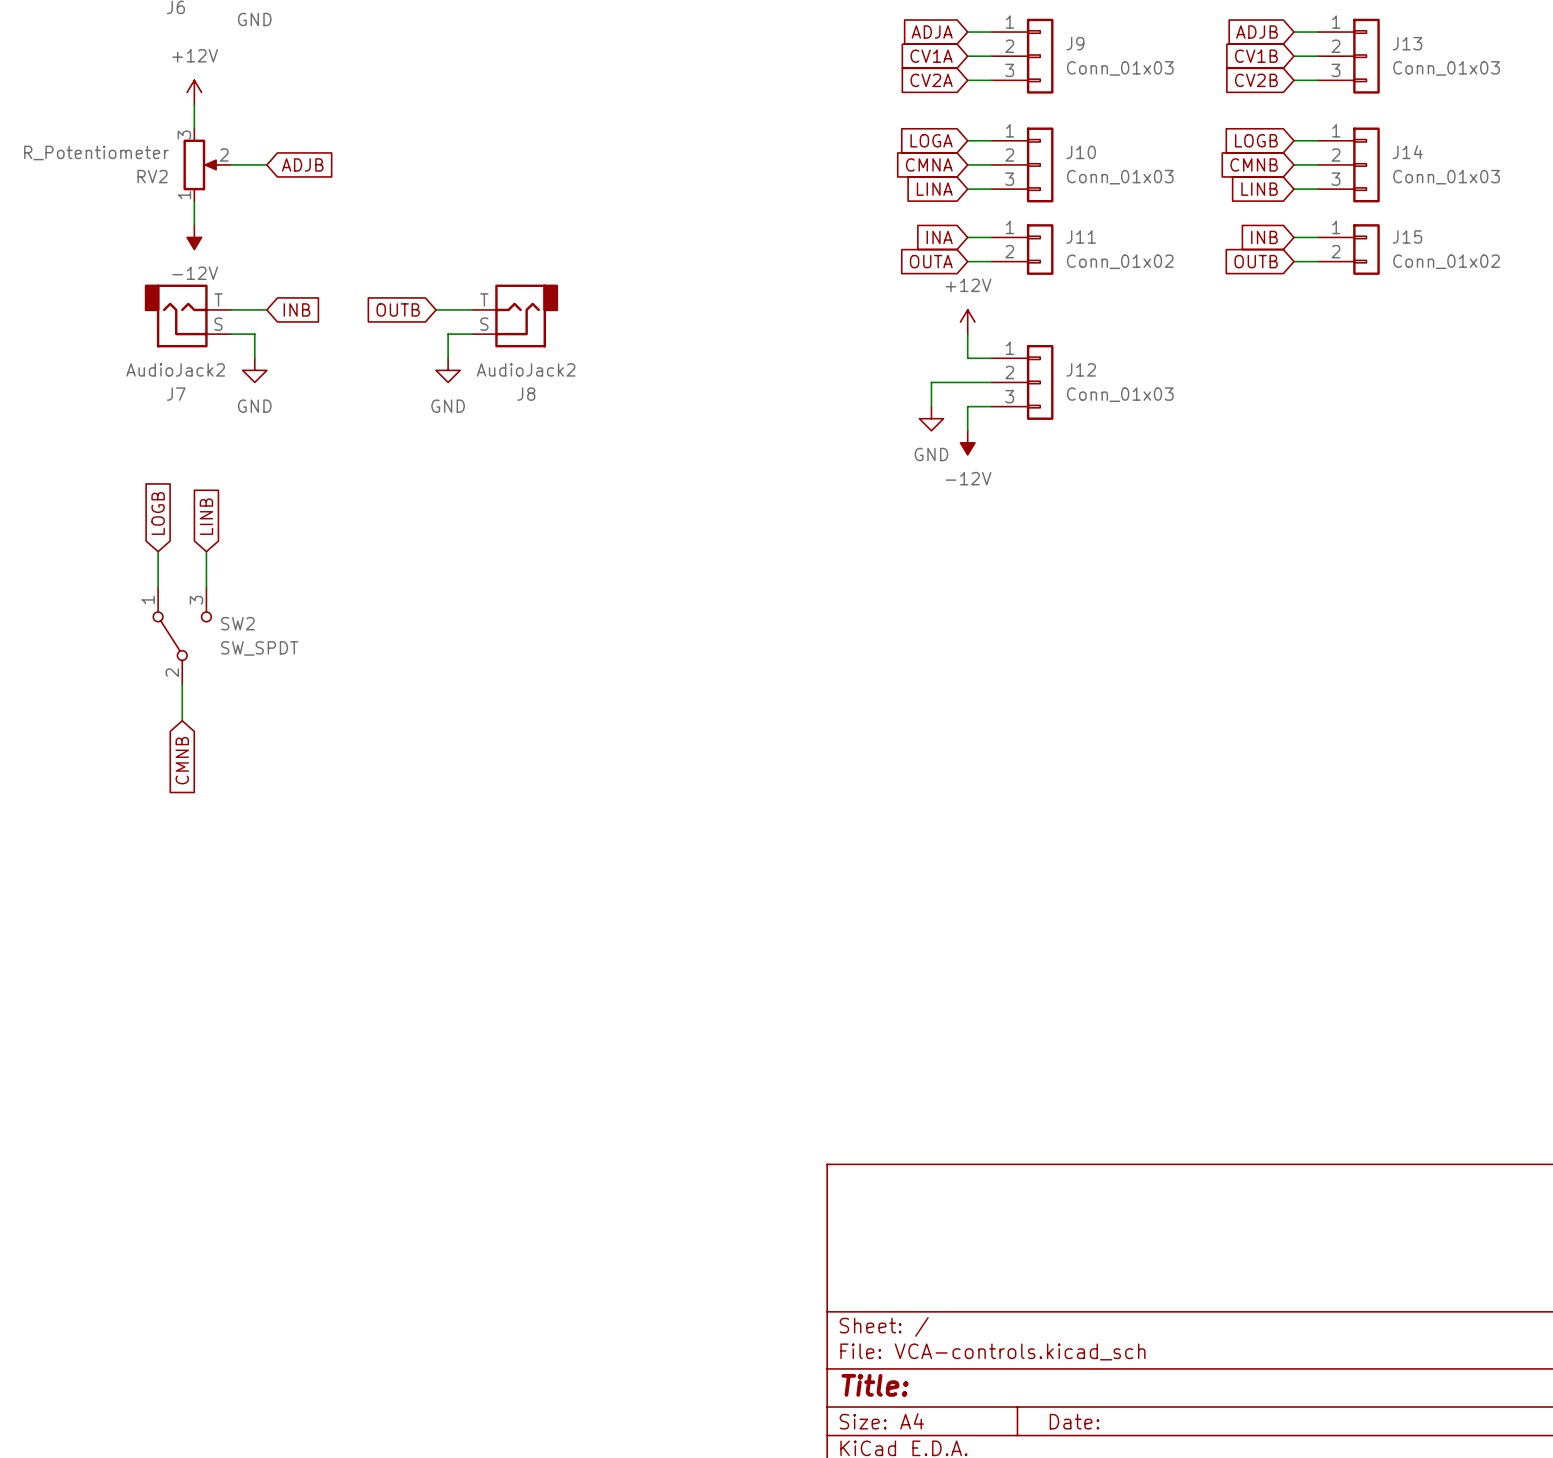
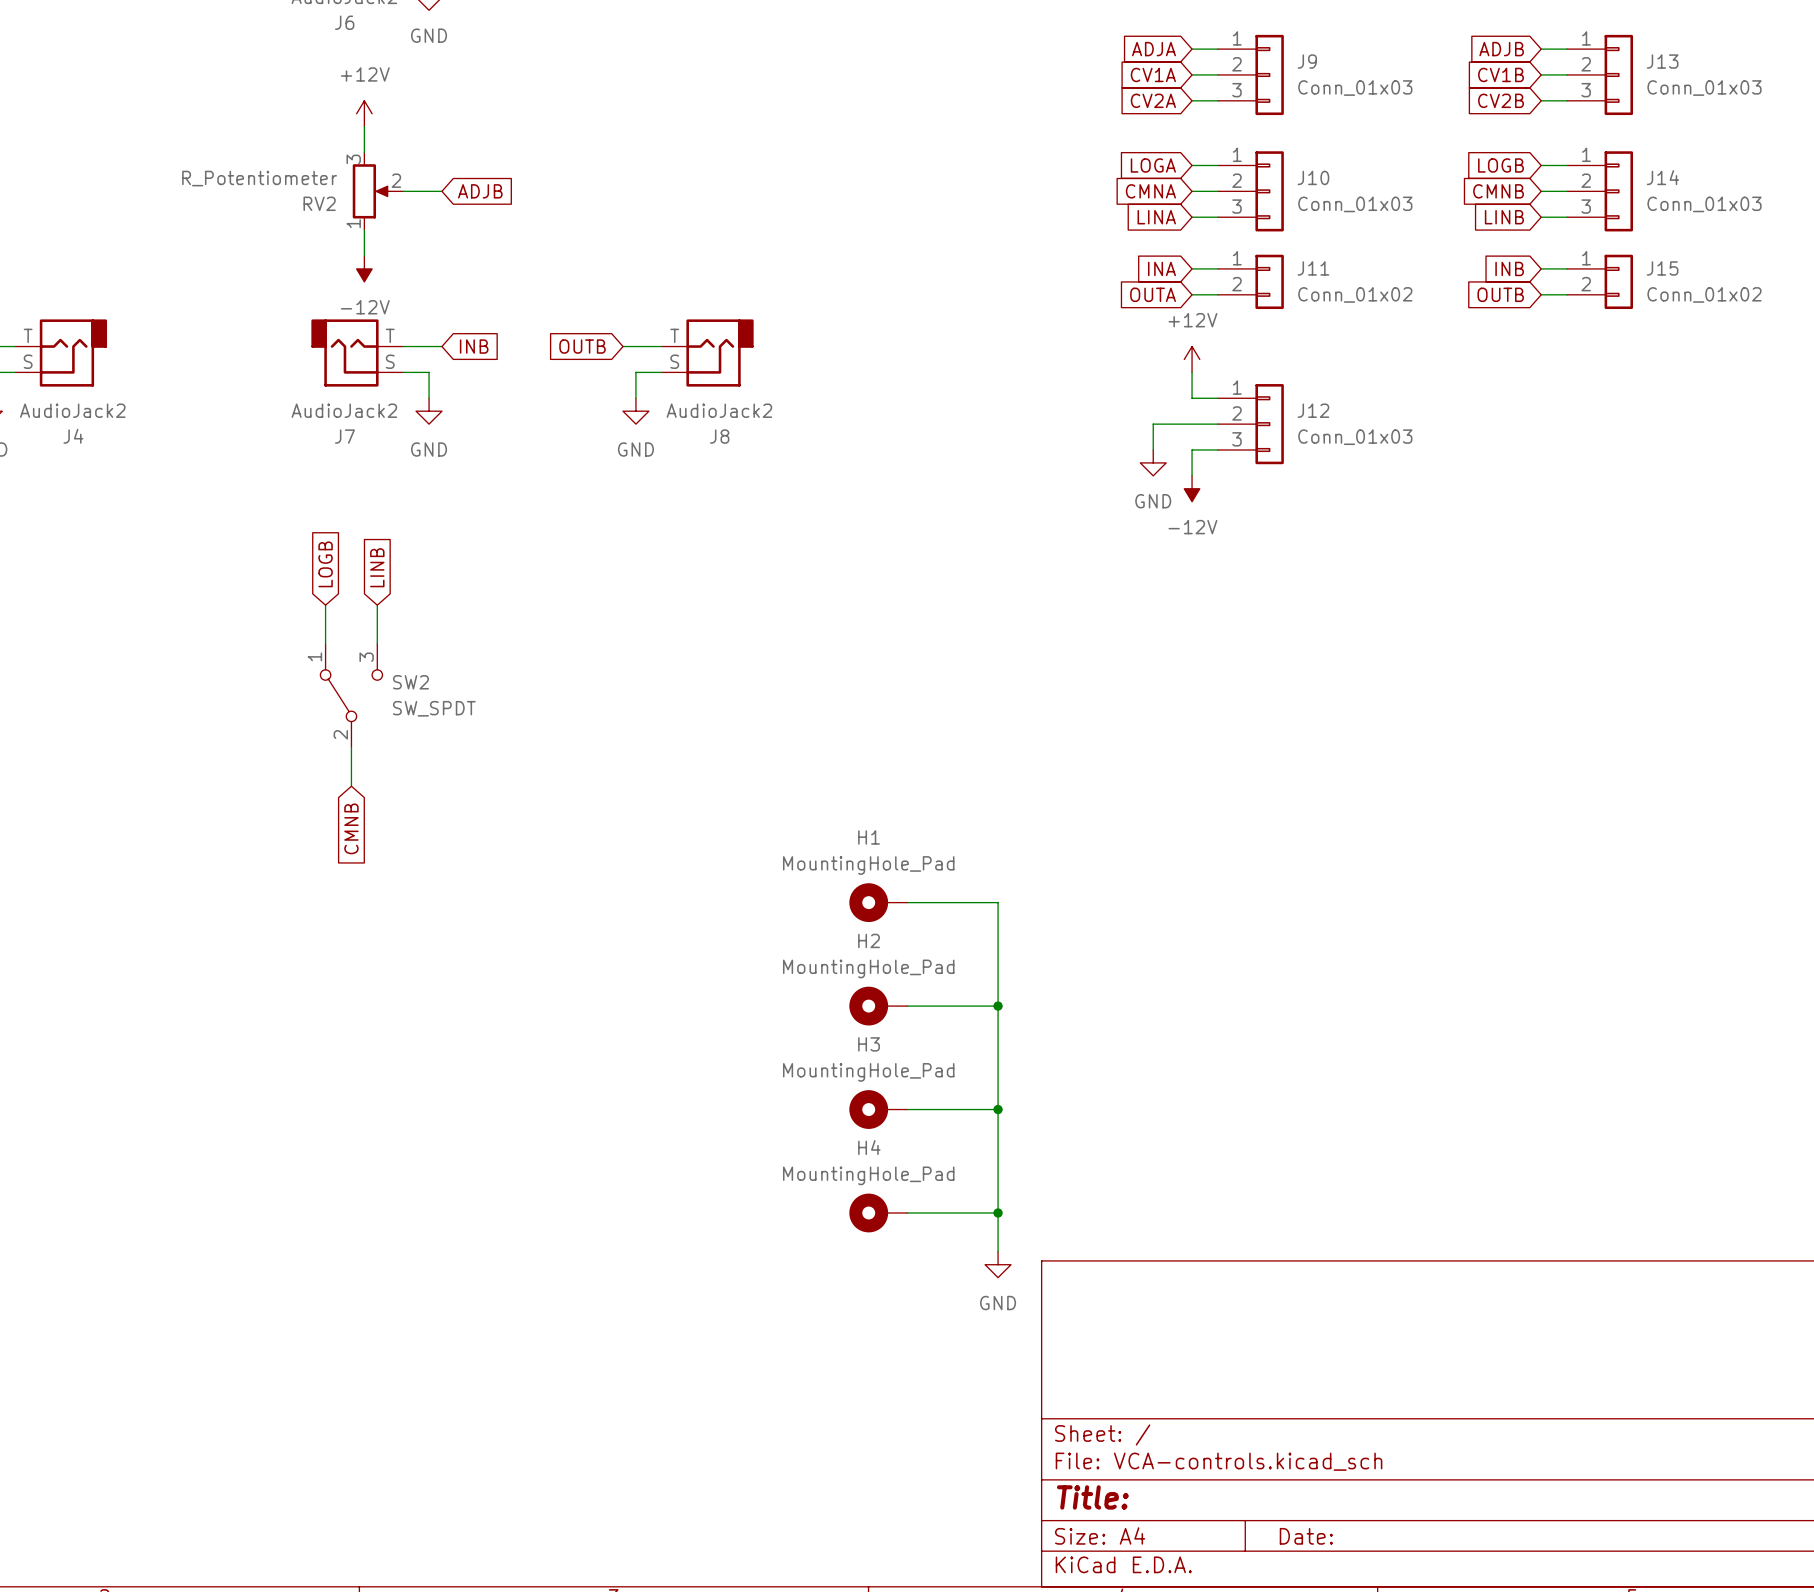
H1: none -> MountingHole_Pad (878, 902)
wire: none -> (907, 902) (998, 902) (998, 1251)
H2: none -> MountingHole_Pad (878, 1006)
wire: none -> (907, 1006) (998, 1006)
junction: none -> (998, 1006)
H3: none -> MountingHole_Pad (878, 1109)
wire: none -> (907, 1109) (998, 1109)
junction: none -> (998, 1109)
H4: none -> MountingHole_Pad (878, 1212)
wire: none -> (907, 1212) (998, 1212)
junction: none -> (998, 1212)
power symbol: none -> GND (998, 1264)

